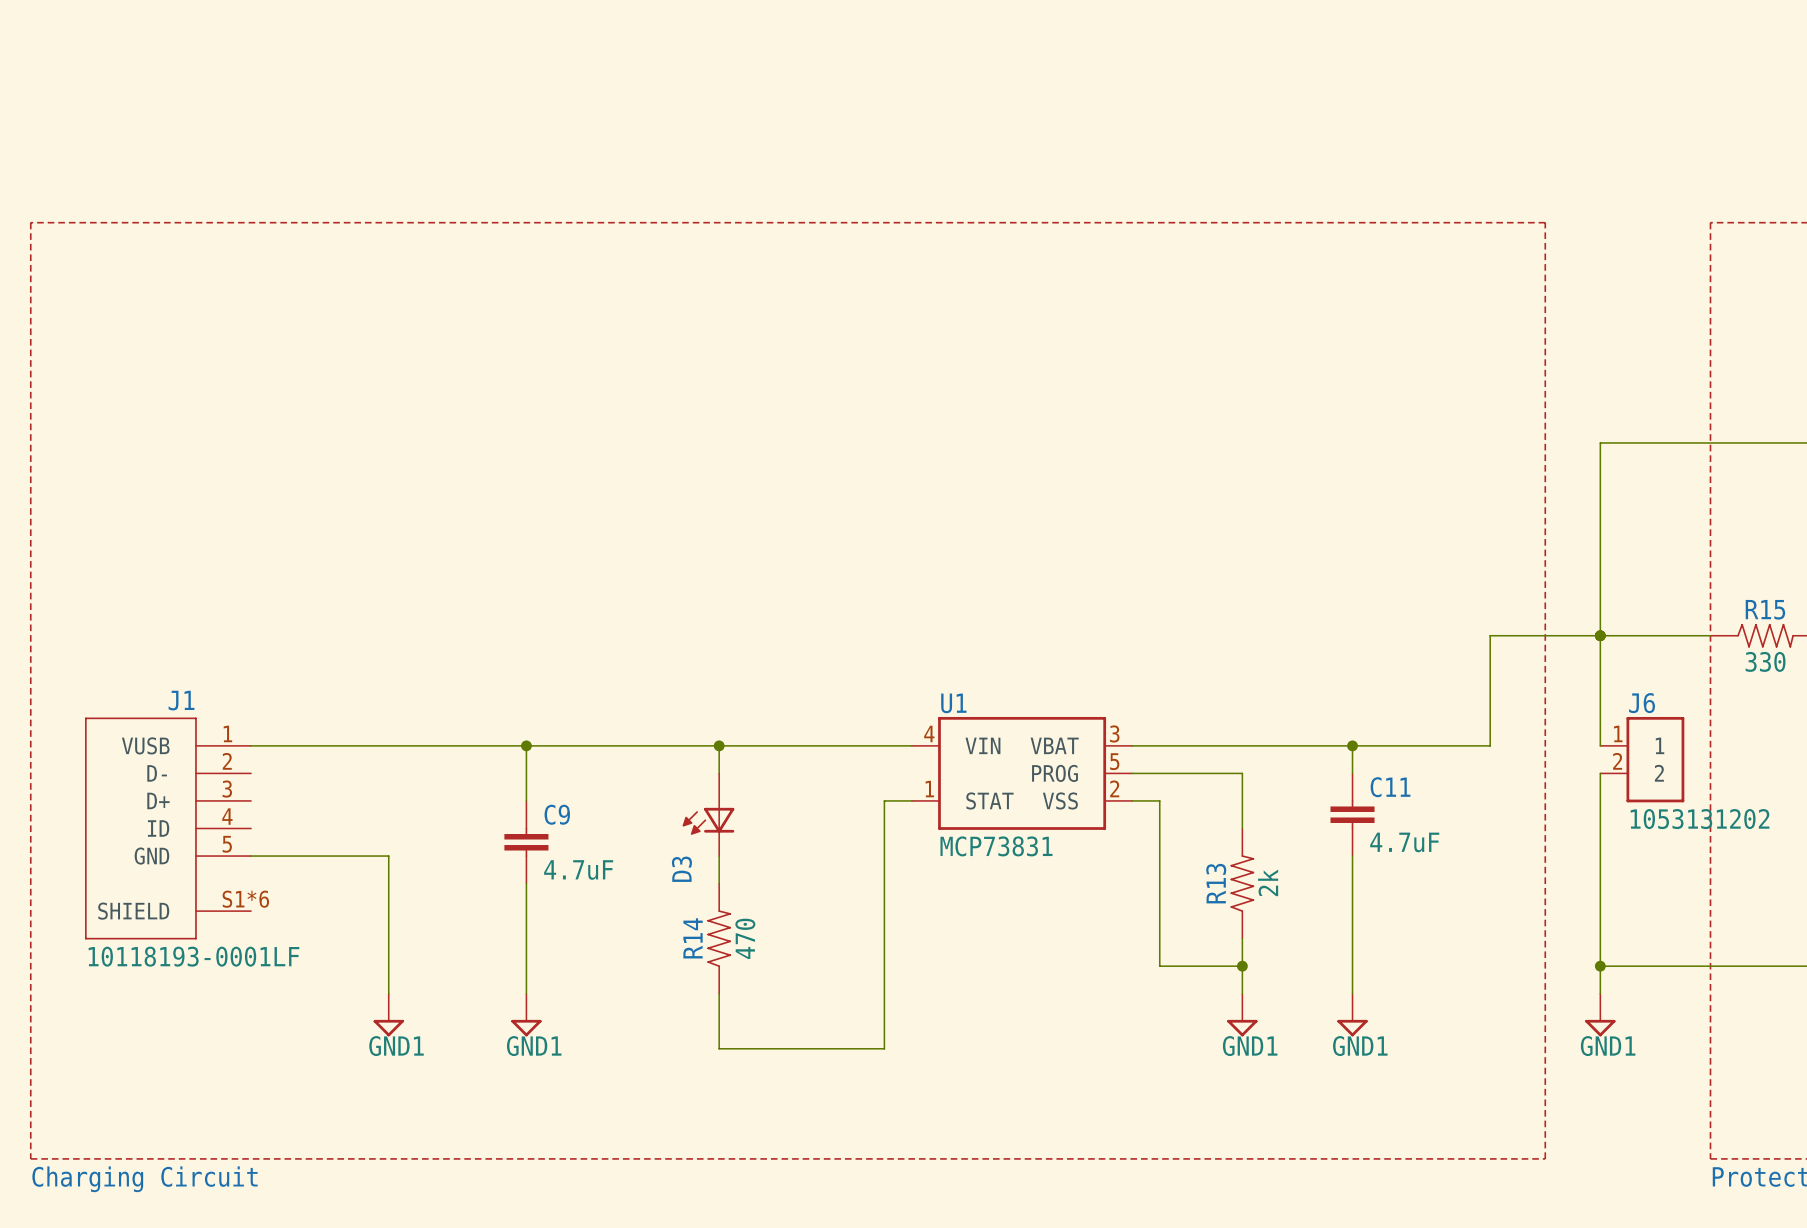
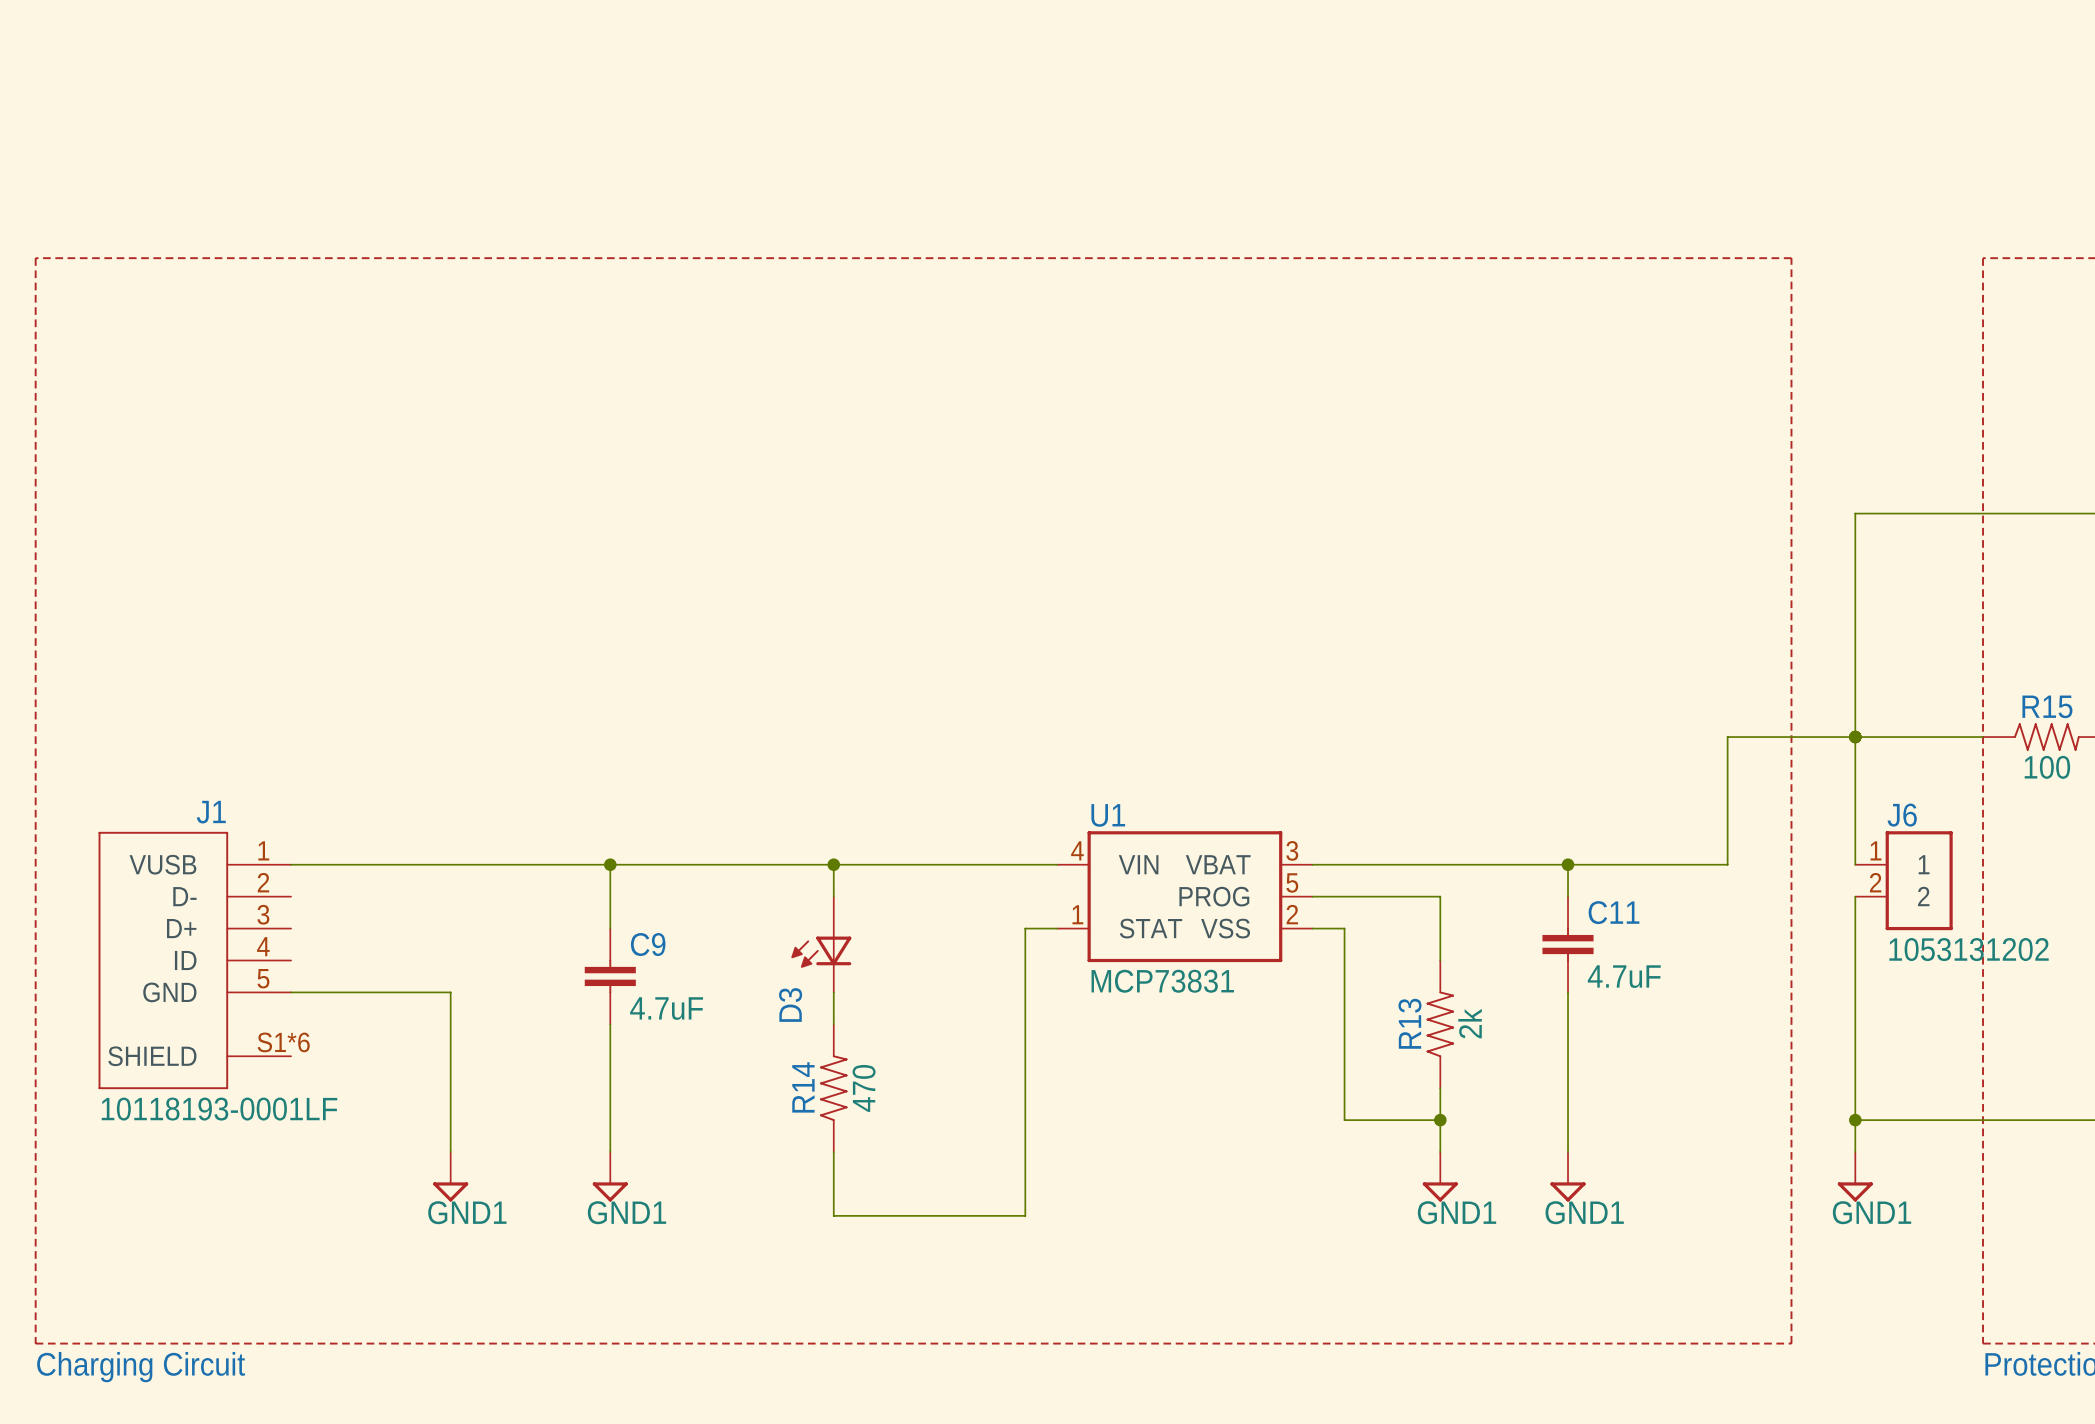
R15 value: 330 (1765, 661) -> 100 (2047, 767)

